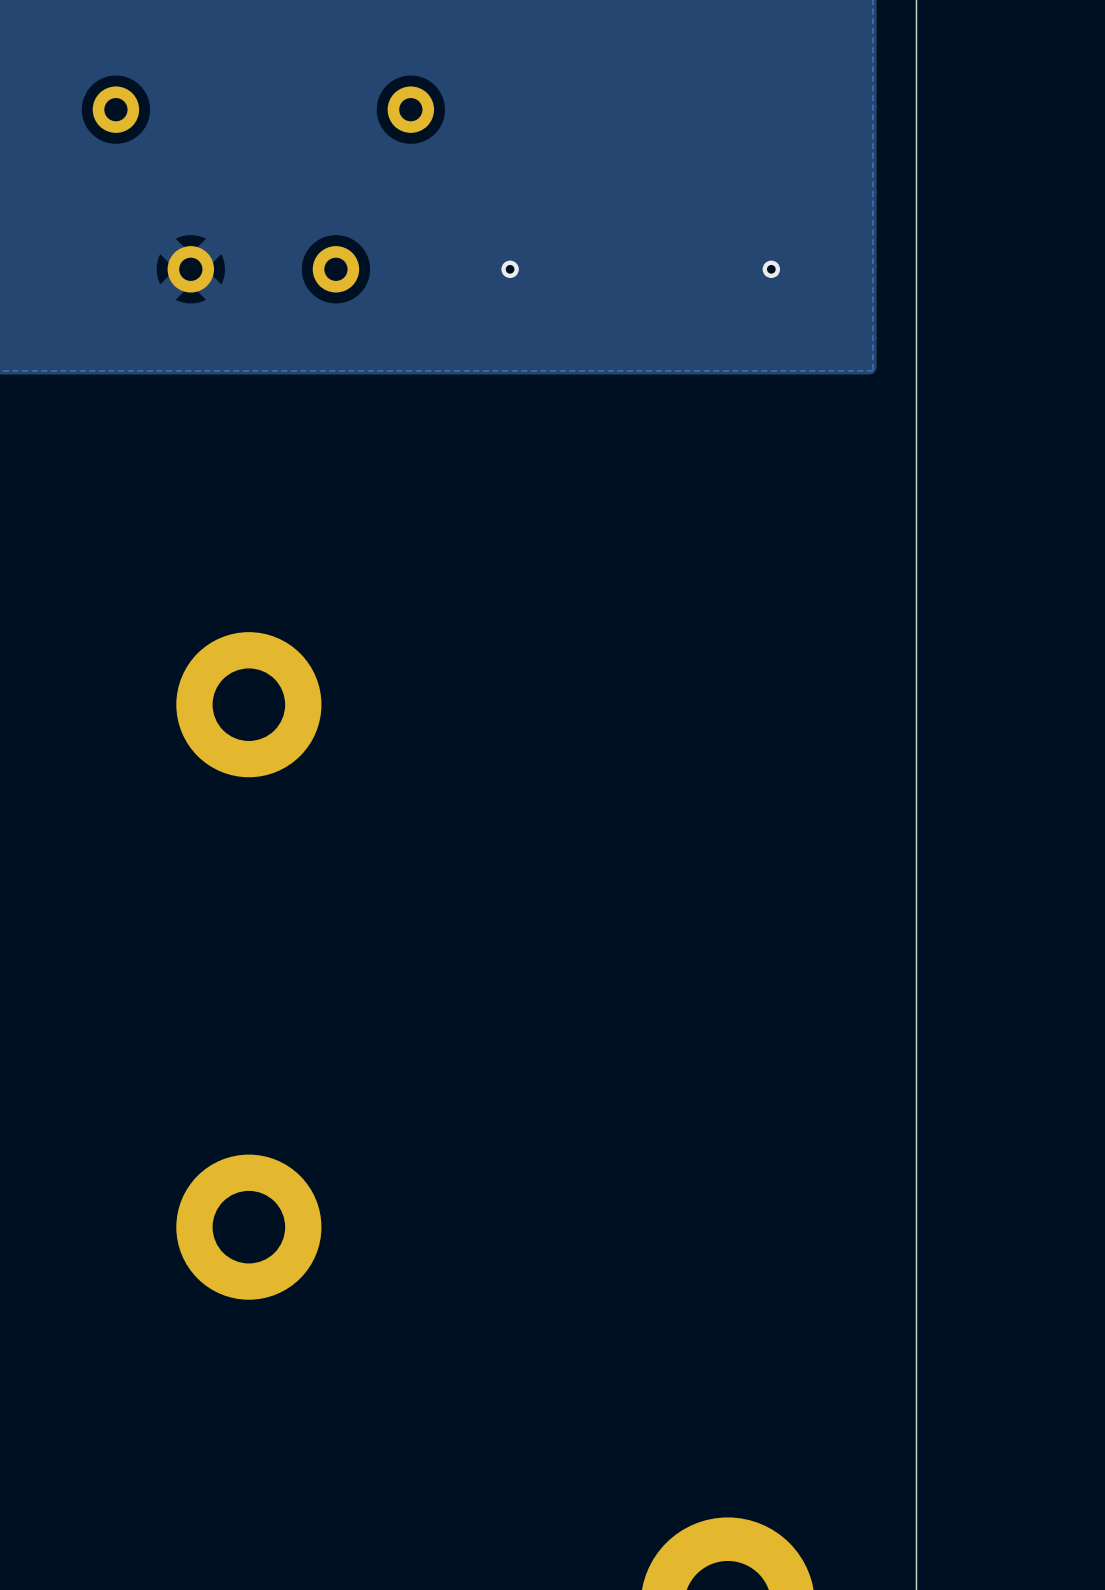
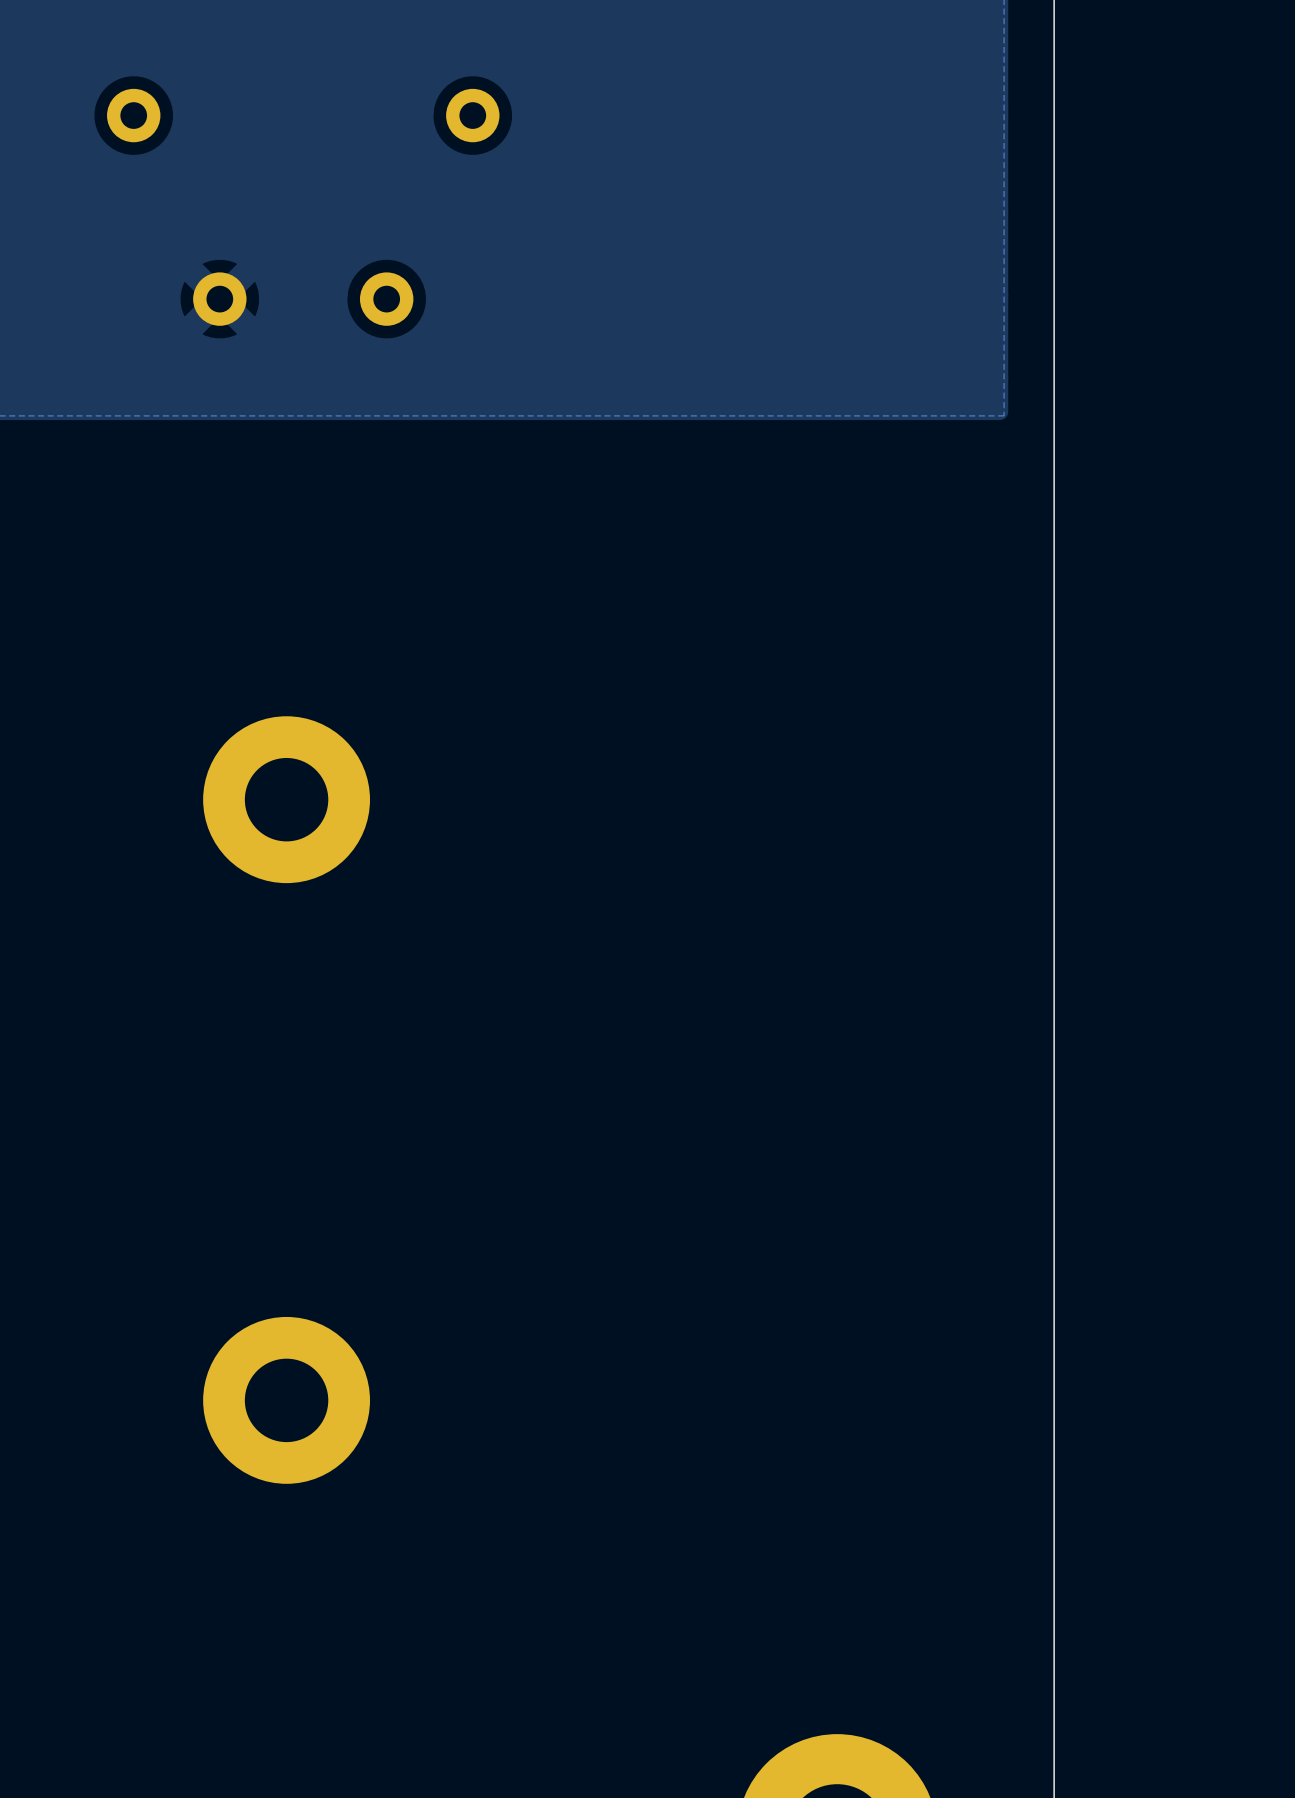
via: (510, 269) -> none
via: (771, 269) -> none

